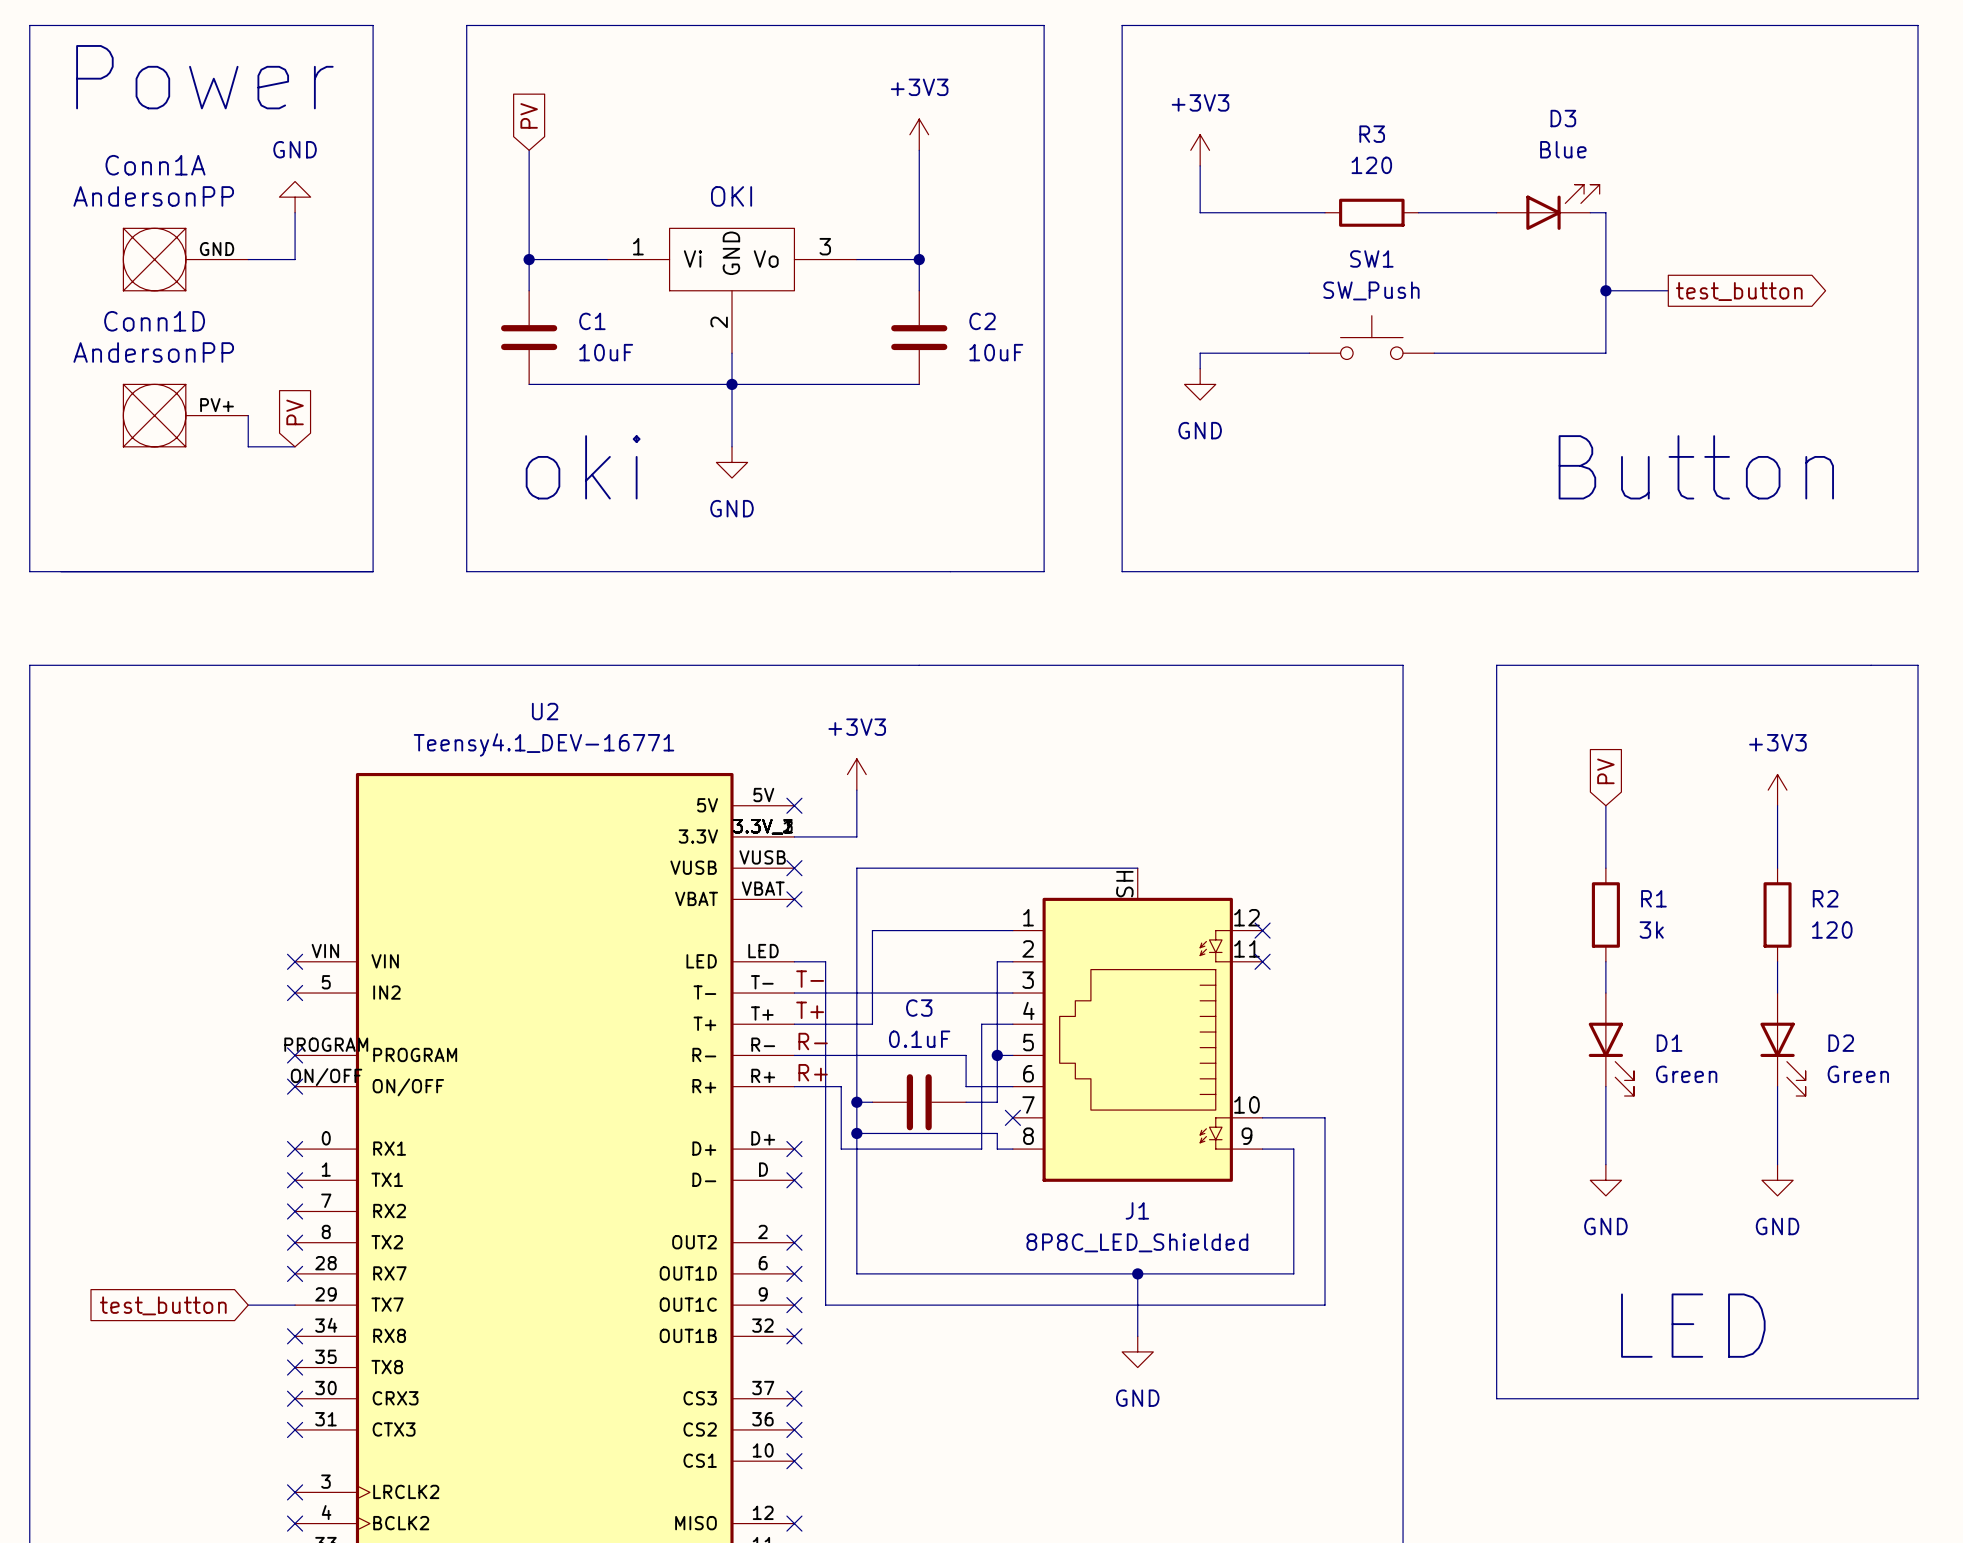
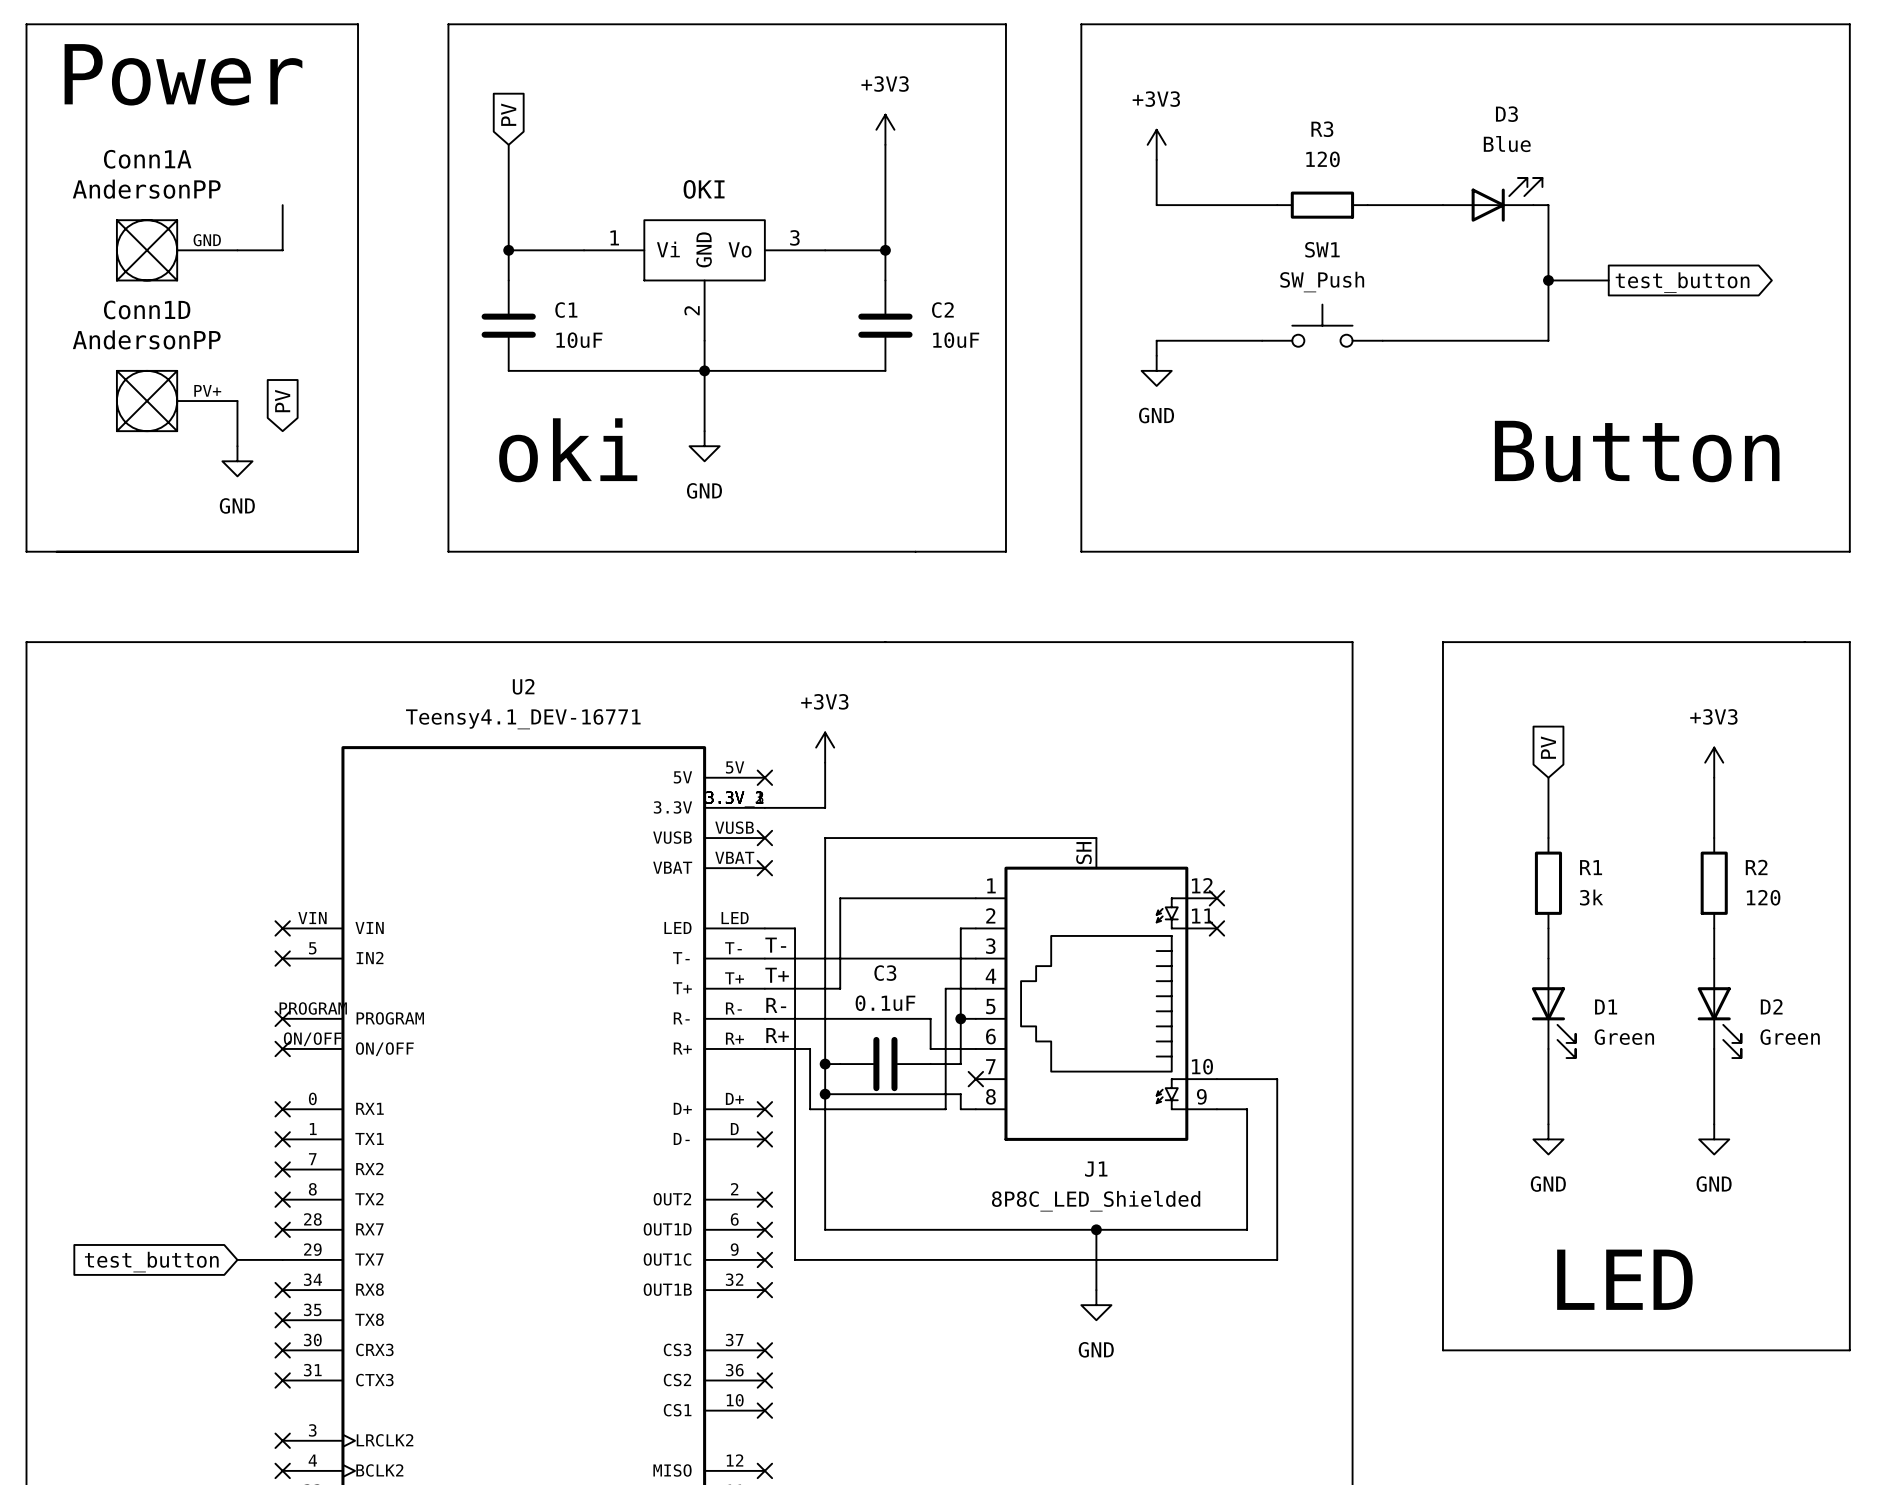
power symbol rotation: 0° (295, 197) -> 180° (237, 461)
power symbol position: GND (295, 197) -> GND (237, 461)
wire: (248, 446) (295, 446) -> (237, 431) (237, 446)

